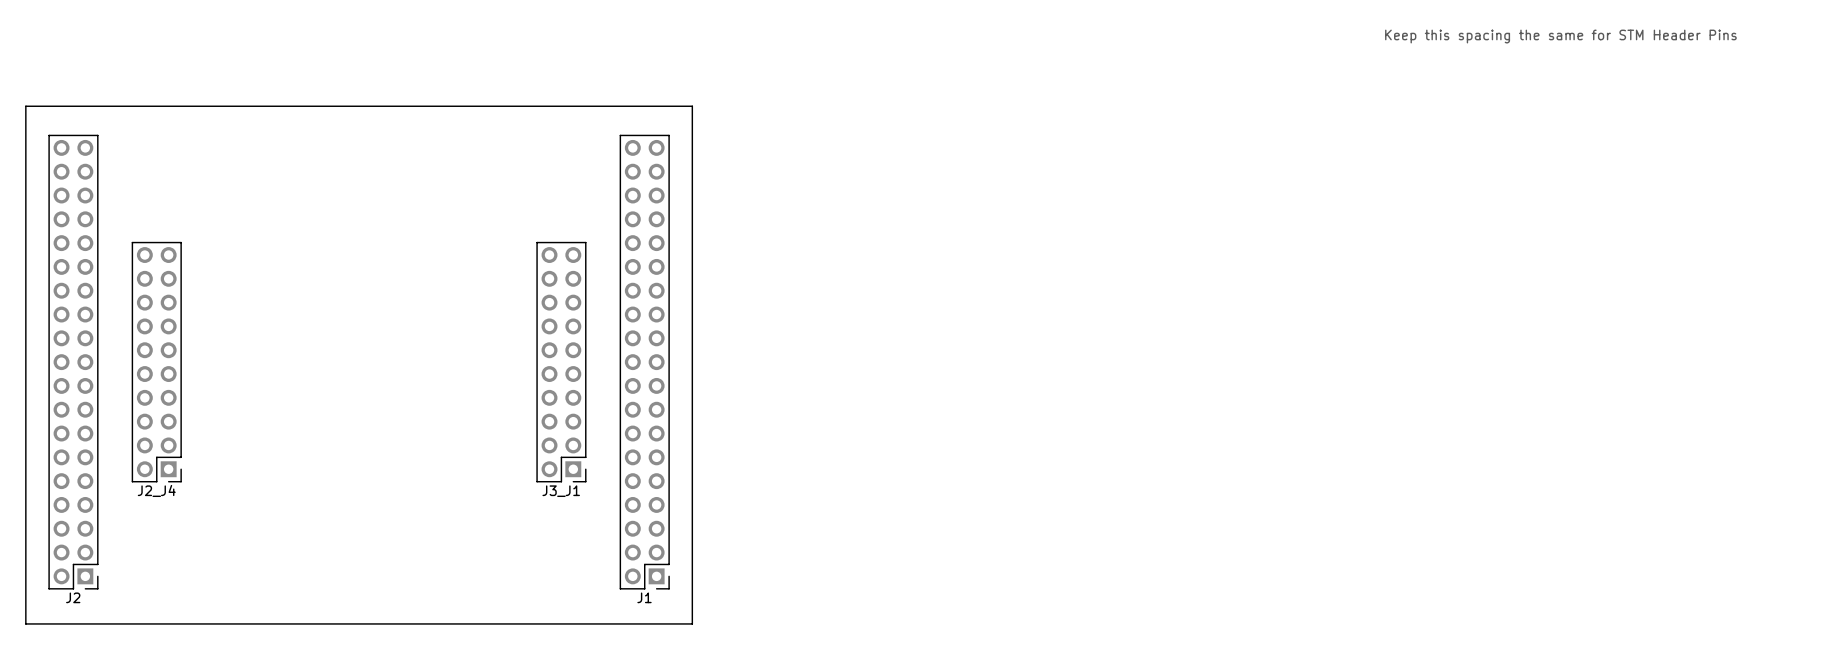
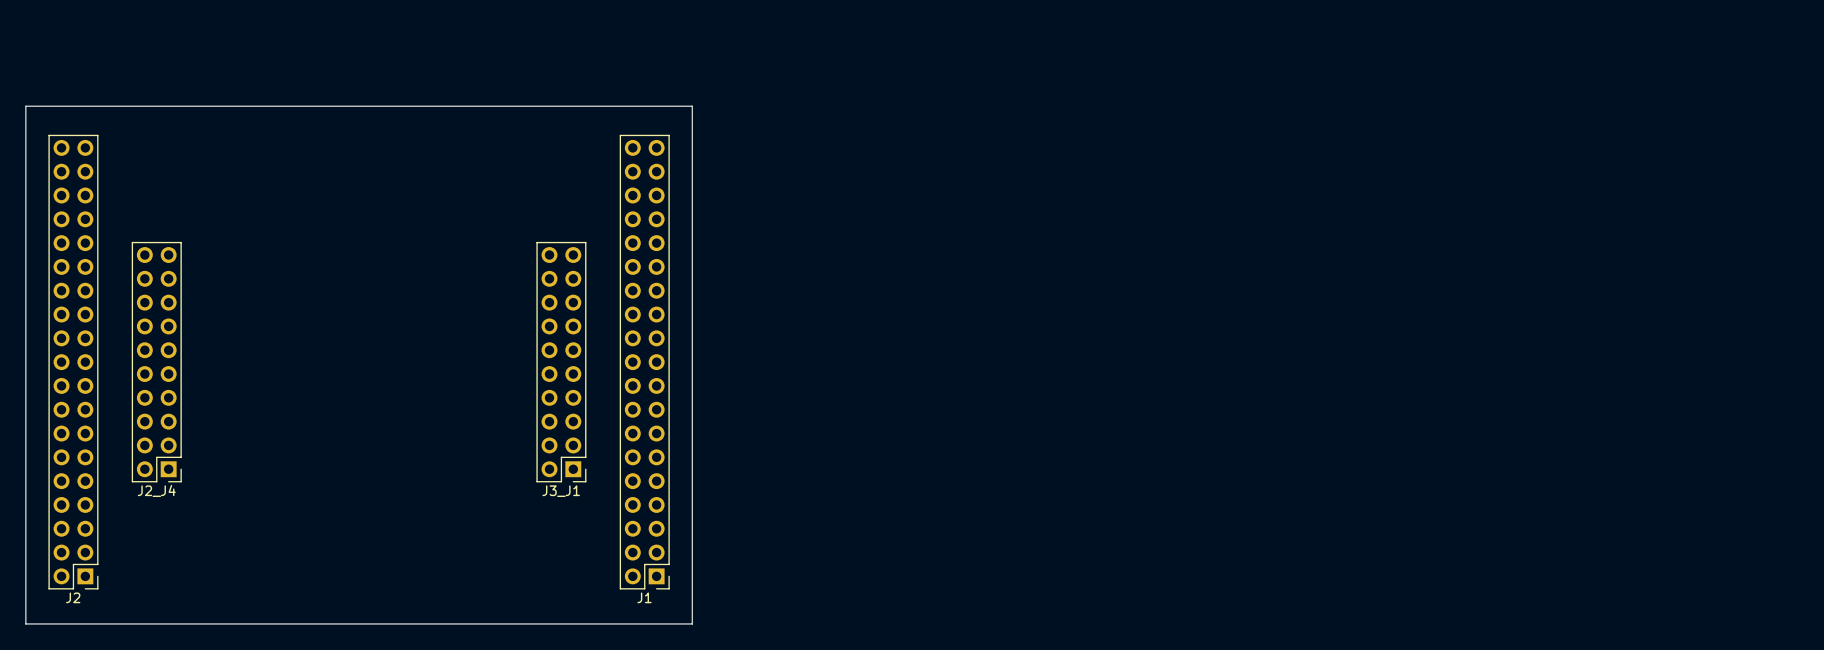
text: Keep this spacing the same for STM Header Pins (1560, 36) -> none

